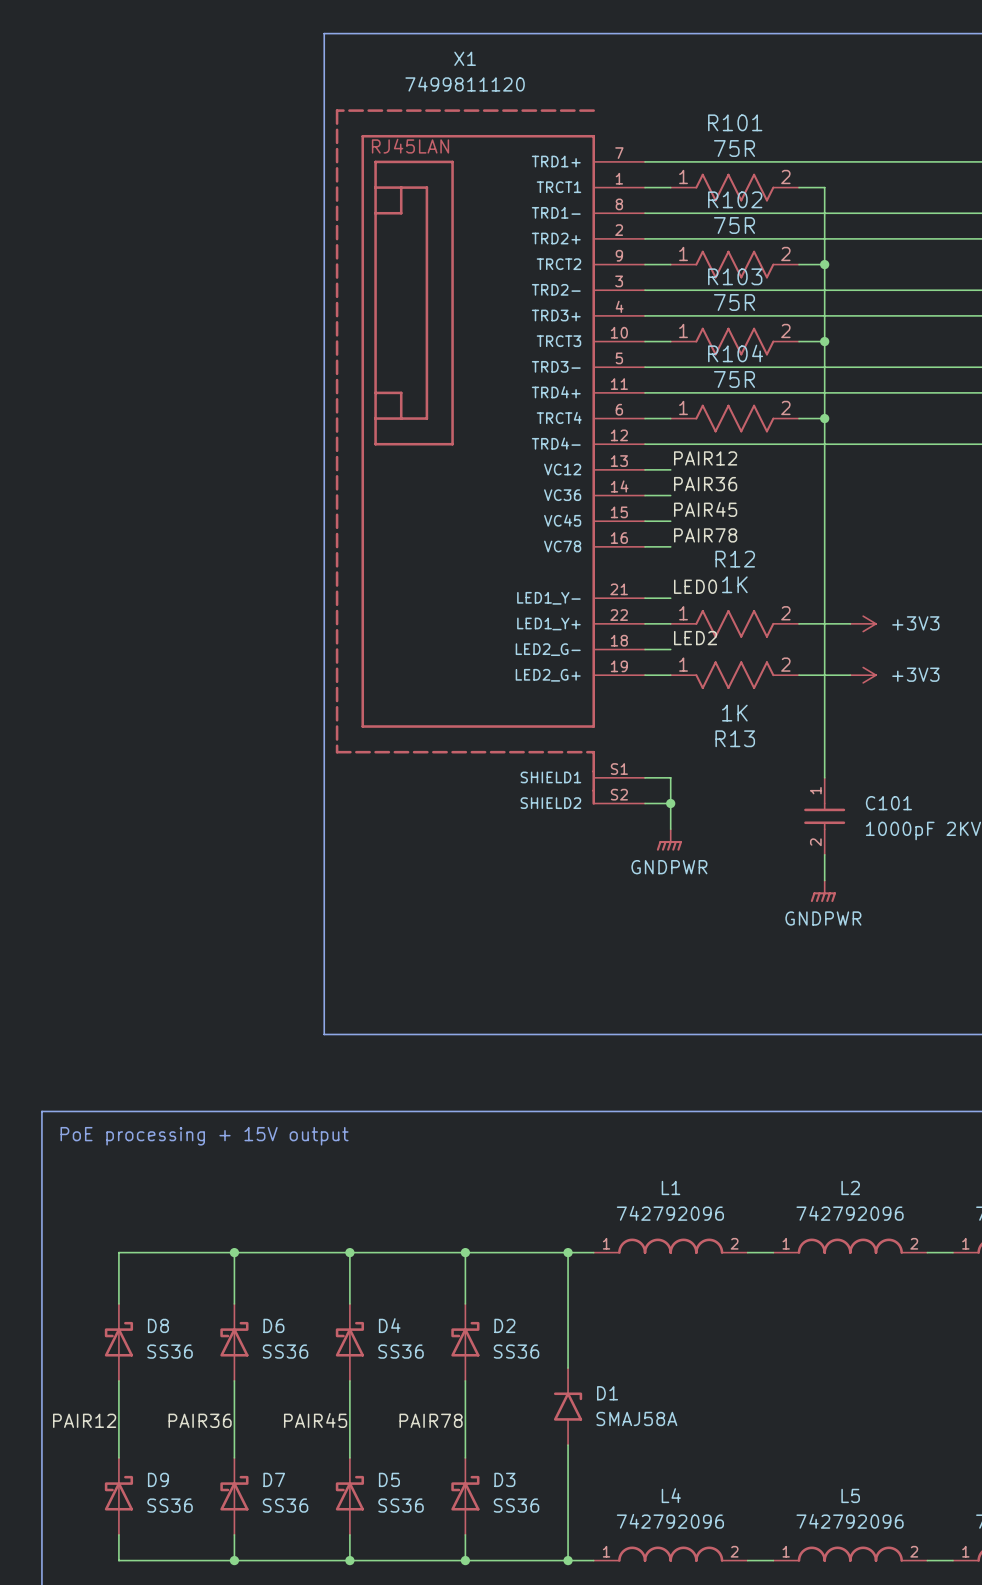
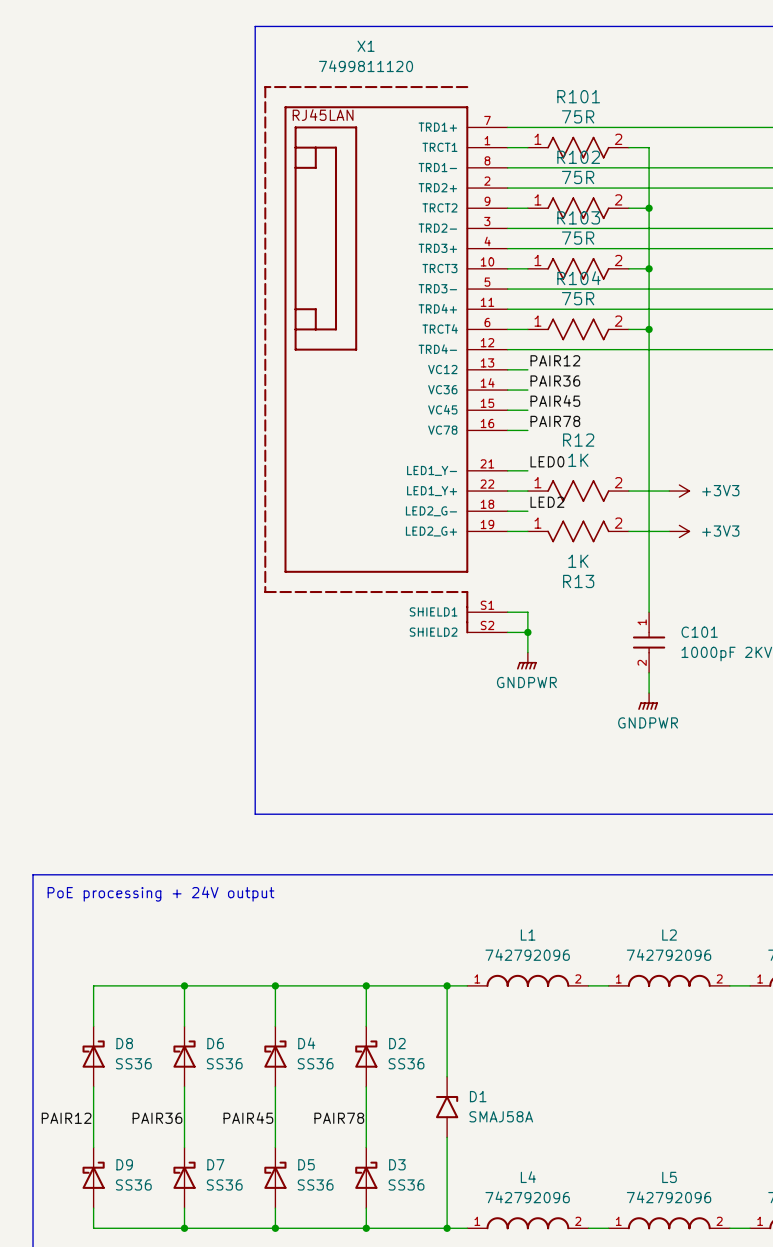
text: PoE processing + 15V output (204, 1136) -> PoE processing + 24V output (160, 894)

